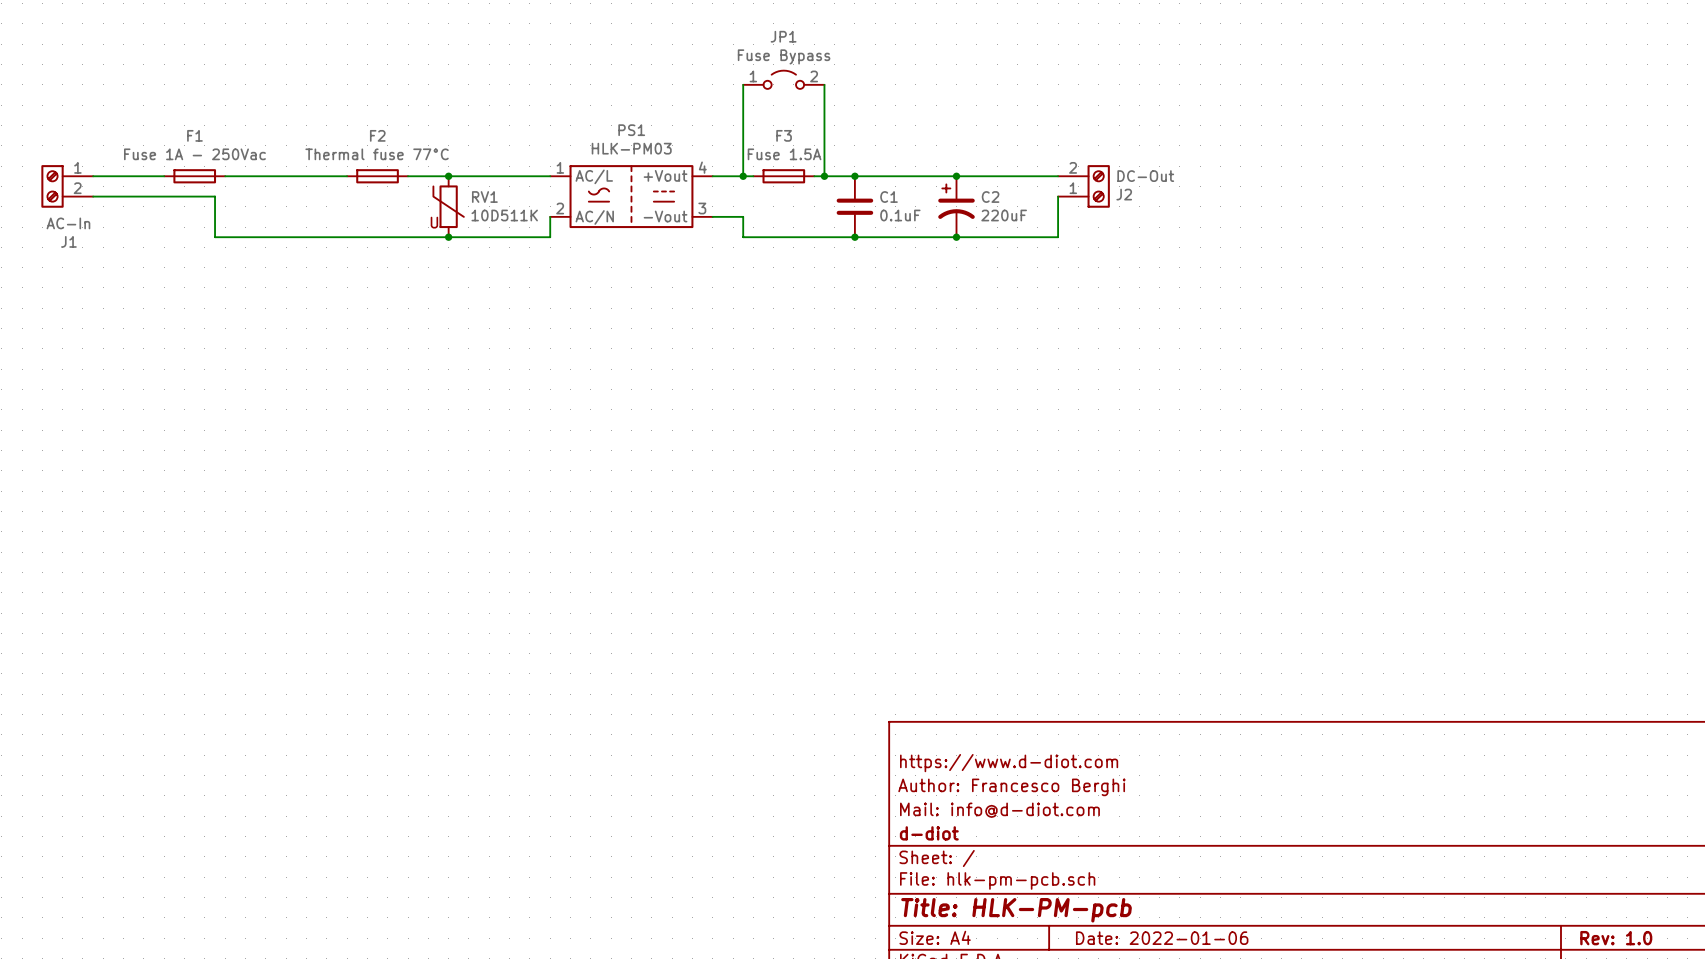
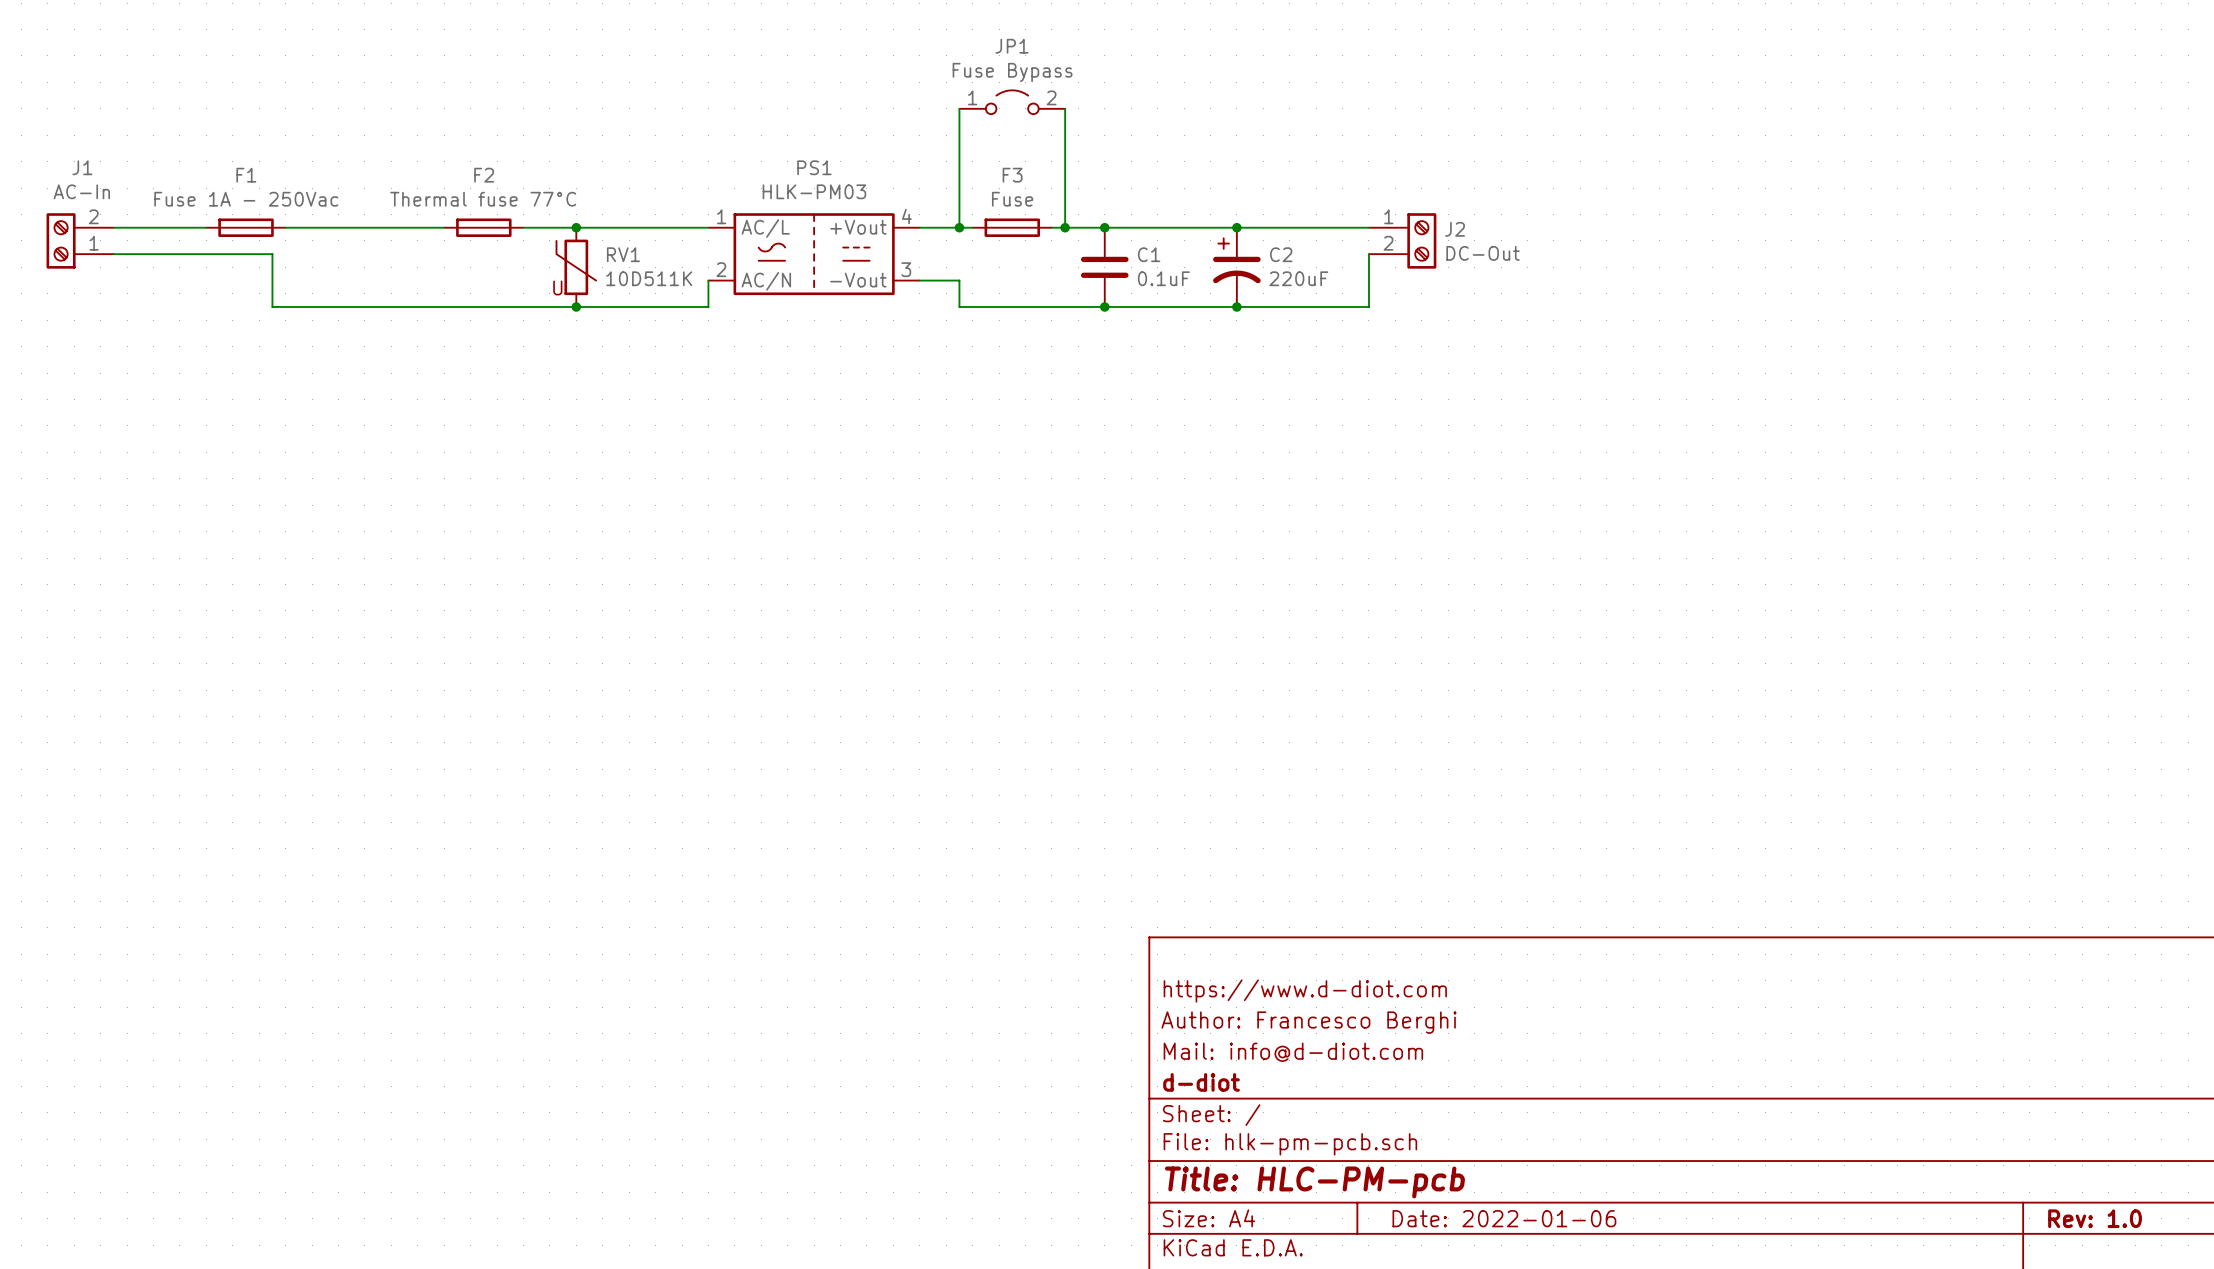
F3 value: Fuse 1.5A (784, 154) -> Fuse (1012, 199)
J1 flip: as is (52, 186) -> up-down (61, 240)
J2 flip: as is (1098, 186) -> up-down (1421, 240)
title block: Title: HLK-PM-pcb (1016, 910) -> Title: HLC-PM-pcb (1314, 1182)

